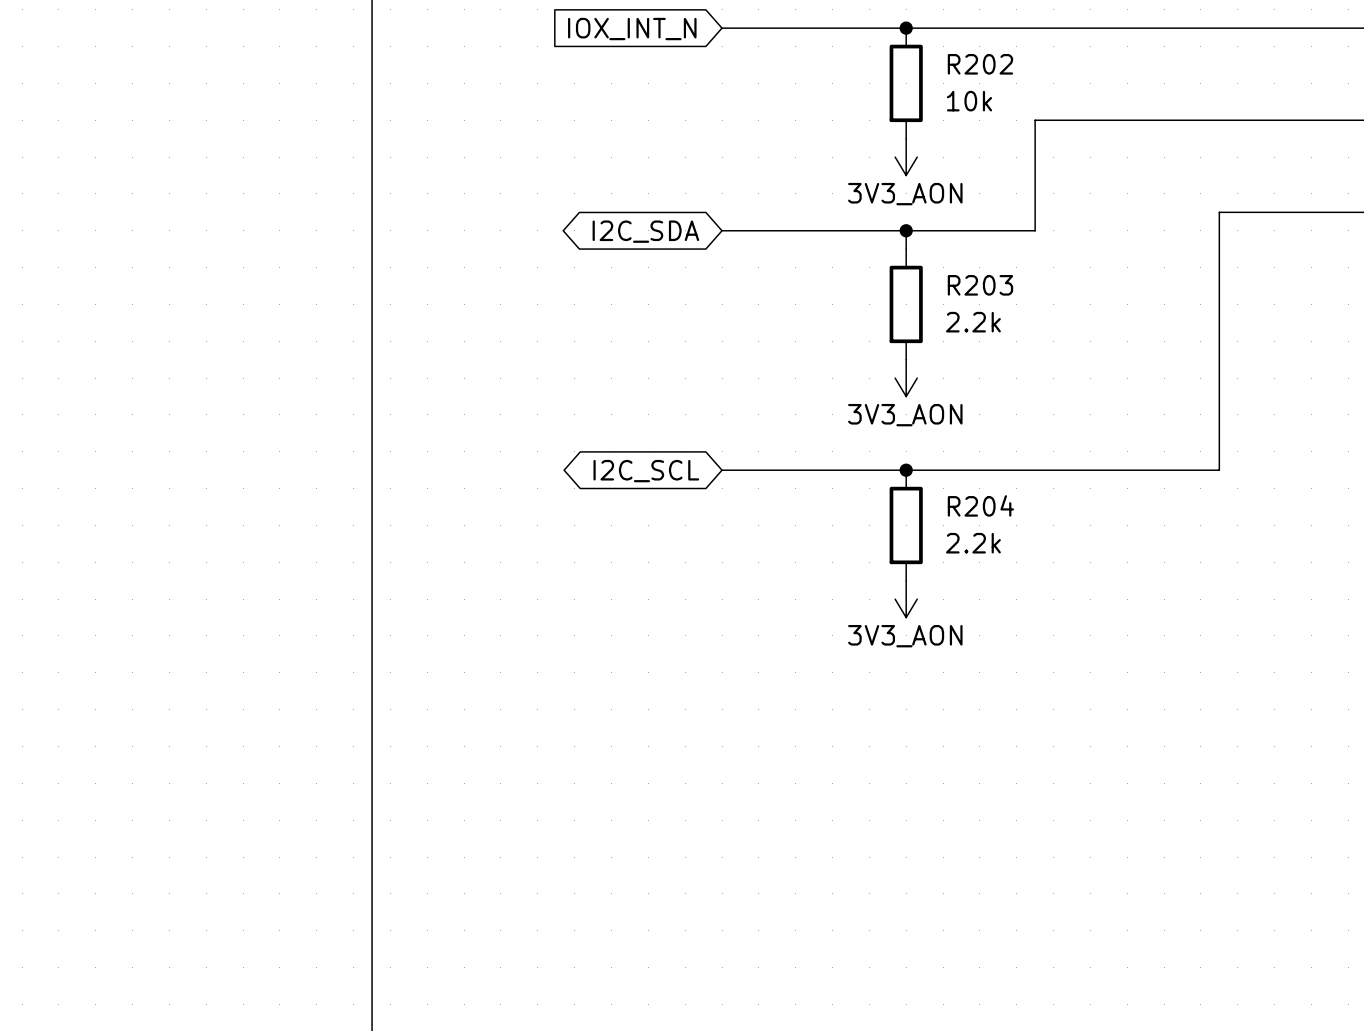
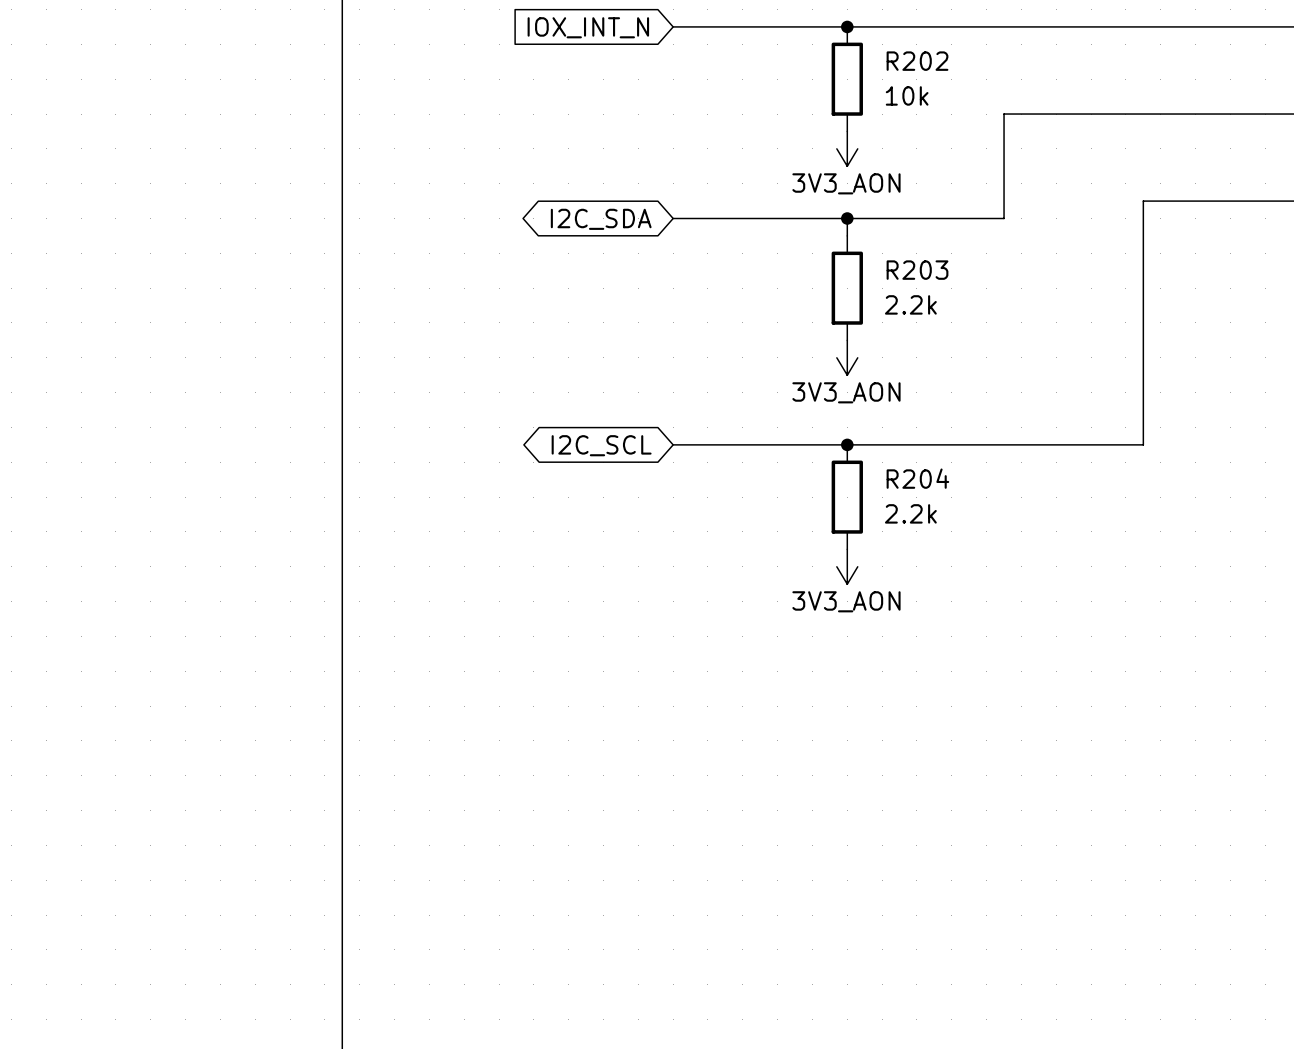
wire: (1071, 120) (1035, 120) (1035, 230) -> (1004, 114) (1004, 218) (969, 218)

